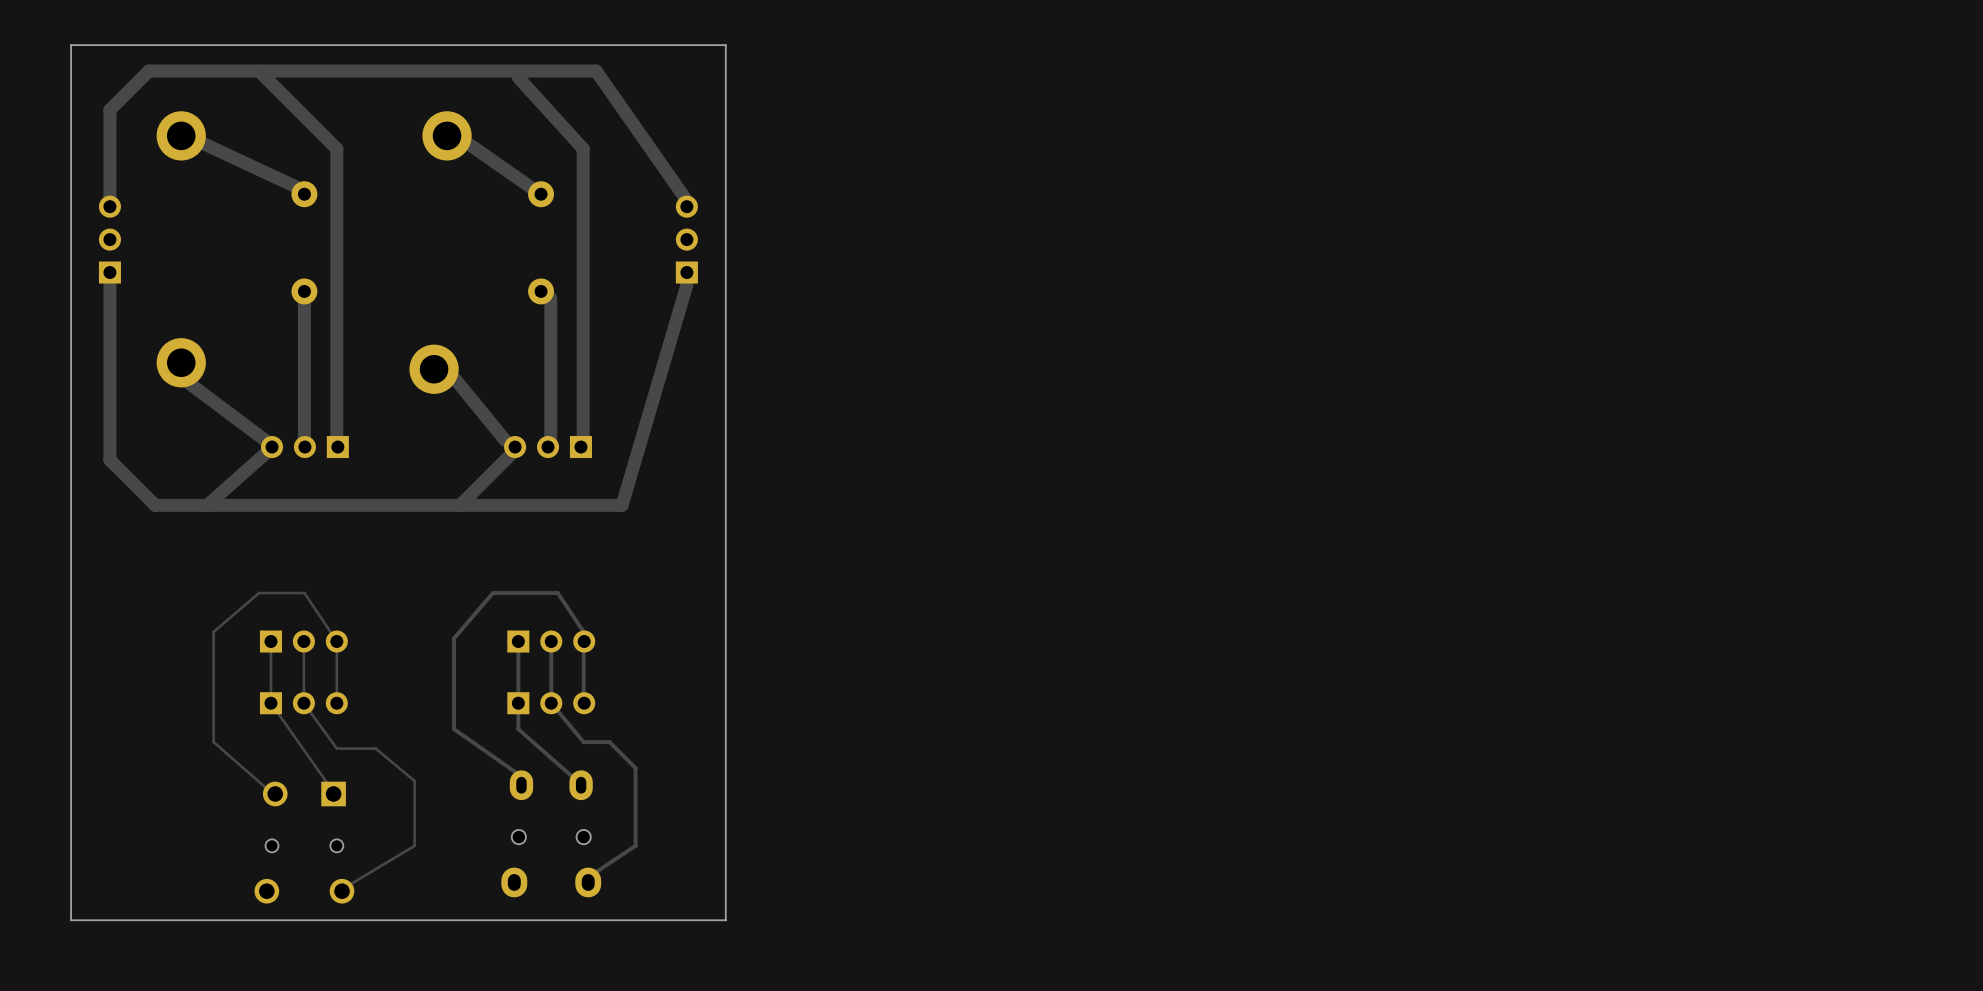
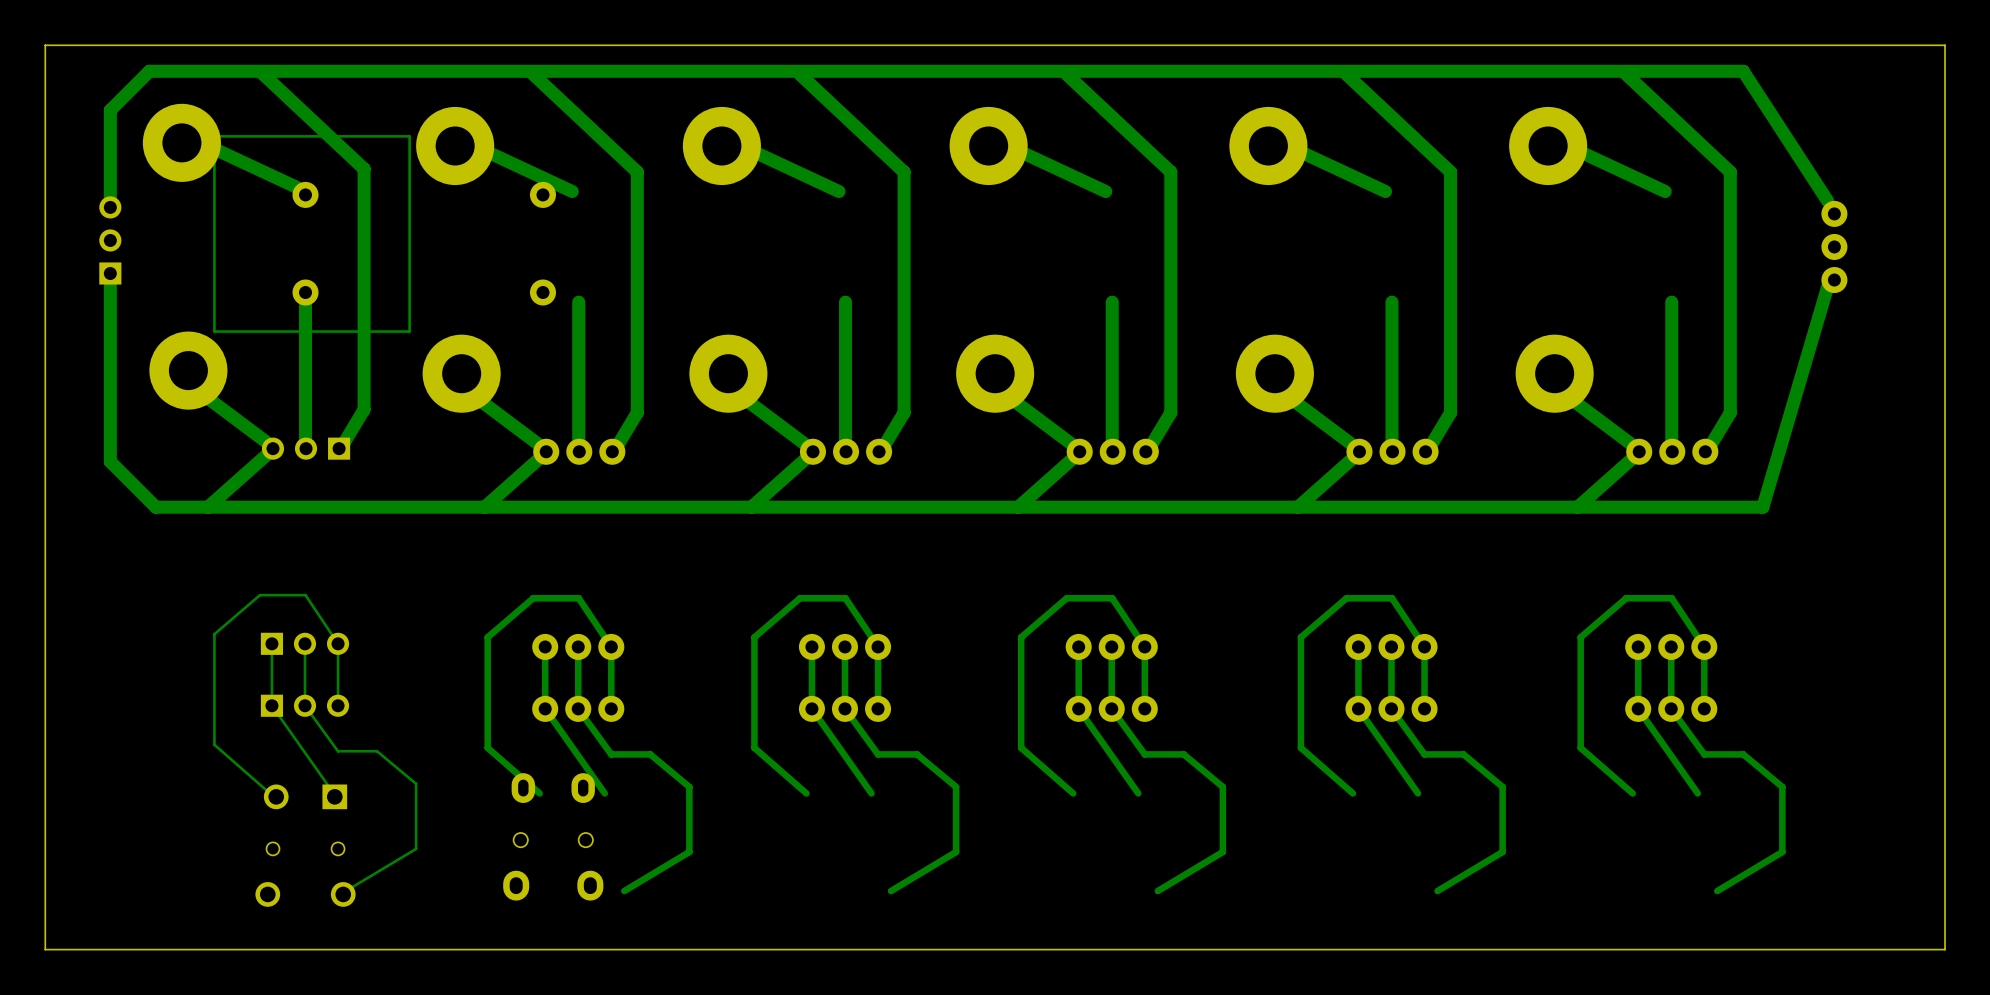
board edge: (725, 45) (725, 920) (71, 920) (71, 45) -> (728, 45) (1945, 45) (1945, 949) (45, 949) (45, 45) (71, 45)
track: (259, 71) (336, 148) (336, 440) -> (259, 71) (364, 168) (364, 409) (344, 442)
track: (596, 71) (686, 200) -> (598, 71) (1743, 71) (1827, 201)
track: none -> (533, 74) (637, 172) (637, 412) (617, 445)
track: none -> (799, 74) (904, 172) (904, 412) (884, 445)
track: none -> (1066, 74) (1170, 172) (1170, 412) (1151, 445)
track: none -> (1346, 74) (1450, 172) (1450, 412) (1431, 445)
track: none -> (1626, 74) (1730, 172) (1730, 412) (1710, 445)
track: (518, 77) (583, 148) (583, 440) -> none
part footprint: [156, 111, 206, 161] -> [142, 103, 221, 182]
part footprint: [422, 111, 472, 161] -> [416, 106, 495, 186]
track: none -> (409, 136) (214, 136) (214, 331) (409, 331) (409, 136)
track: (466, 142) (531, 187) -> none
track: none -> (474, 145) (572, 191)
part: none -> (721, 145)
track: none -> (741, 145) (839, 191)
part: none -> (988, 145)
track: none -> (1008, 145) (1105, 191)
part: none -> (1268, 145)
track: none -> (1287, 145) (1385, 191)
part: none -> (1548, 145)
track: none -> (1567, 145) (1665, 191)
part: (686, 239) -> none
part: none -> (1834, 246)
track: (686, 284) (622, 505) -> (1827, 286) (1762, 507) (624, 507)
track: (550, 297) (550, 440) -> (578, 302) (578, 445)
track: none -> (845, 302) (845, 445)
track: none -> (1112, 302) (1112, 445)
track: none -> (1392, 302) (1392, 445)
track: none -> (1671, 302) (1671, 445)
part footprint: [156, 338, 206, 388] -> [149, 331, 228, 410]
part: (434, 369) -> none
track: (447, 369) (505, 440) -> none
part: none -> (461, 373)
part: none -> (728, 373)
part: none -> (995, 373)
part: none -> (1274, 373)
part: none -> (1554, 373)
track: none -> (461, 386) (539, 445)
track: none -> (728, 386) (806, 445)
track: none -> (995, 386) (1073, 445)
track: none -> (1274, 386) (1352, 445)
track: none -> (1554, 386) (1632, 445)
part: (548, 447) -> none
part: none -> (579, 451)
part: none -> (846, 451)
part: none -> (1112, 451)
part: none -> (1392, 451)
part: none -> (1672, 451)
track: (511, 453) (460, 505) -> none
track: none -> (539, 458) (484, 507)
track: none -> (806, 458) (751, 507)
track: none -> (1073, 458) (1018, 507)
track: none -> (1352, 458) (1297, 507)
track: none -> (1632, 458) (1577, 507)
track: (583, 631) (557, 593) (492, 593) (454, 638) (454, 729) (518, 774) -> none
track: (518, 641) (518, 729) (577, 781) -> none
track: (551, 641) (551, 703) (583, 742) (609, 742) (635, 768) (635, 845) (596, 871) -> none
part: (551, 641) -> none
track: none -> (545, 646) (545, 708) (604, 793)
track: none -> (578, 646) (578, 708) (611, 754) (650, 754) (689, 786) (689, 852) (624, 891)
part: none -> (578, 646)
track: none -> (811, 646) (811, 708) (871, 793)
track: none -> (844, 646) (844, 708) (878, 754) (917, 754) (956, 786) (956, 852) (891, 891)
part: none -> (844, 646)
track: none -> (1078, 646) (1078, 708) (1138, 793)
track: none -> (1111, 646) (1111, 708) (1144, 754) (1183, 754) (1222, 786) (1222, 852) (1157, 891)
part: none -> (1111, 646)
track: none -> (1358, 646) (1358, 708) (1418, 793)
track: none -> (1391, 646) (1391, 708) (1424, 754) (1463, 754) (1502, 786) (1502, 852) (1437, 891)
part: none -> (1391, 646)
track: none -> (1638, 646) (1638, 708) (1697, 793)
track: none -> (1671, 646) (1671, 708) (1704, 754) (1743, 754) (1782, 786) (1782, 852) (1717, 891)
part: none -> (1671, 646)
track: (583, 651) (583, 696) -> none
track: none -> (611, 702) (611, 646) (578, 598) (533, 598) (487, 637) (487, 747) (539, 793)
track: none -> (878, 702) (878, 646) (845, 598) (799, 598) (754, 637) (754, 747) (806, 793)
track: none -> (1144, 702) (1144, 646) (1112, 598) (1066, 598) (1021, 637) (1021, 747) (1073, 793)
track: none -> (1424, 702) (1424, 646) (1392, 598) (1346, 598) (1300, 637) (1300, 747) (1352, 793)
track: none -> (1704, 702) (1704, 646) (1671, 598) (1626, 598) (1580, 637) (1580, 747) (1632, 793)
part: (551, 703) -> none
part: none -> (578, 708)
part: none -> (844, 708)
part: none -> (1111, 708)
part: none -> (1391, 708)
part: none -> (1671, 708)

